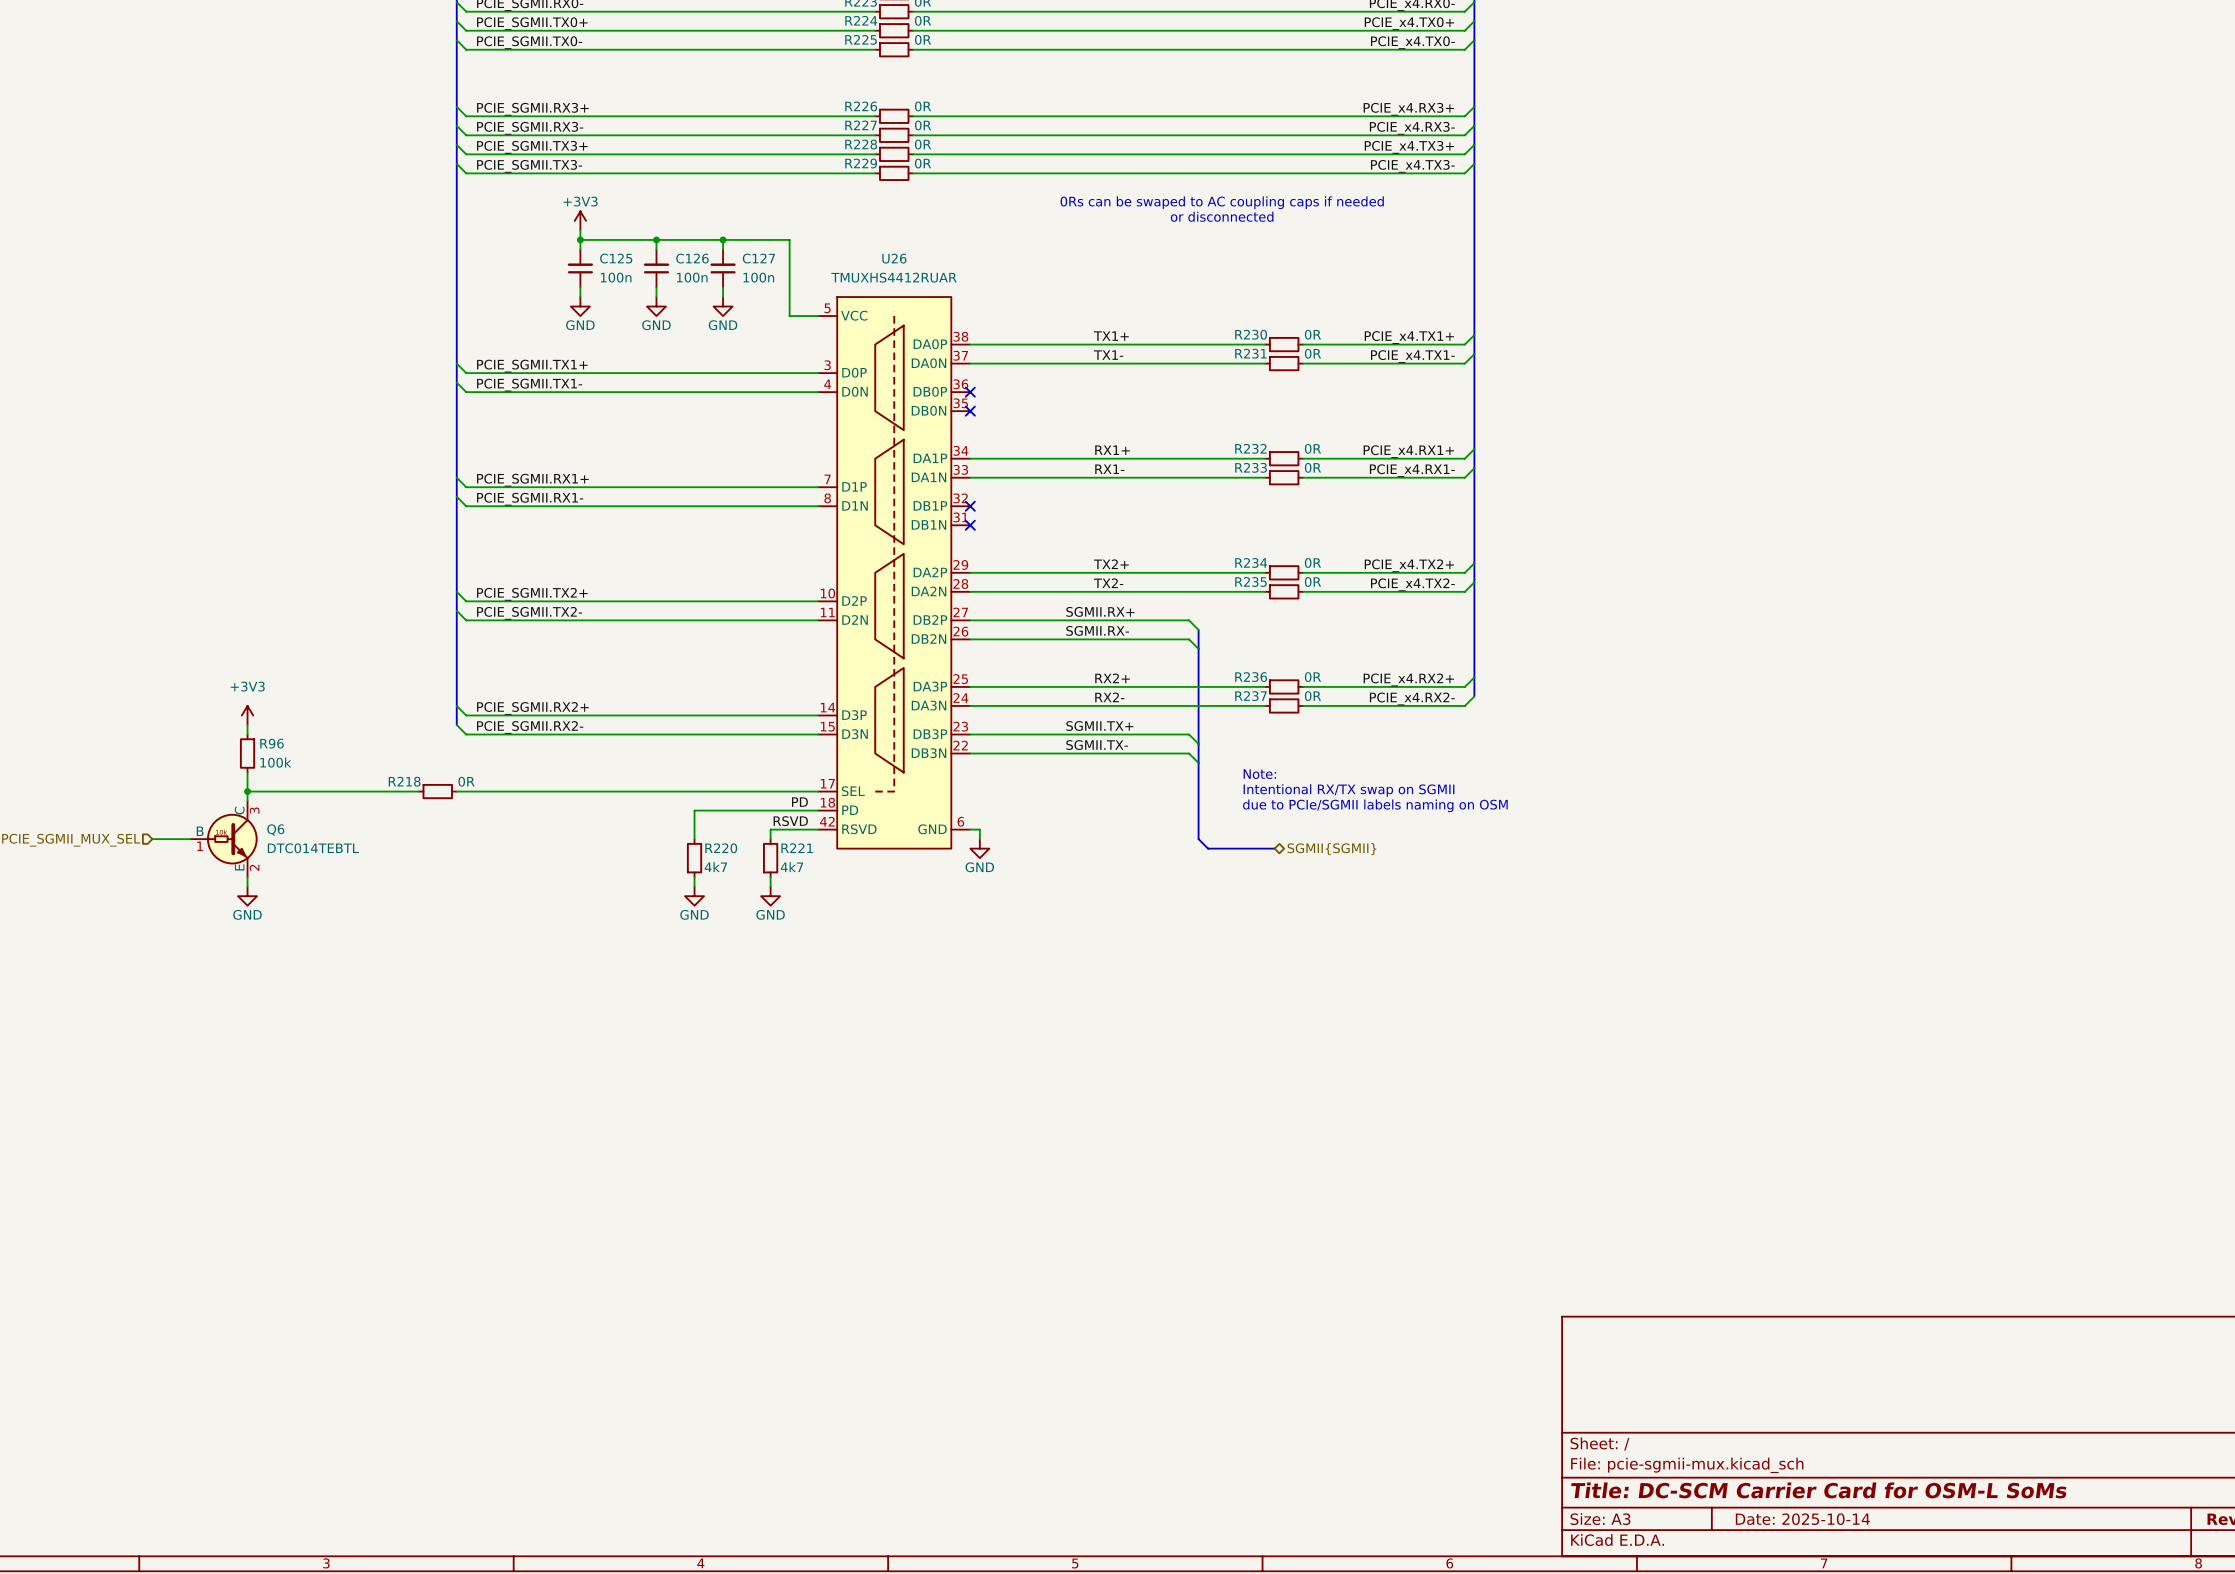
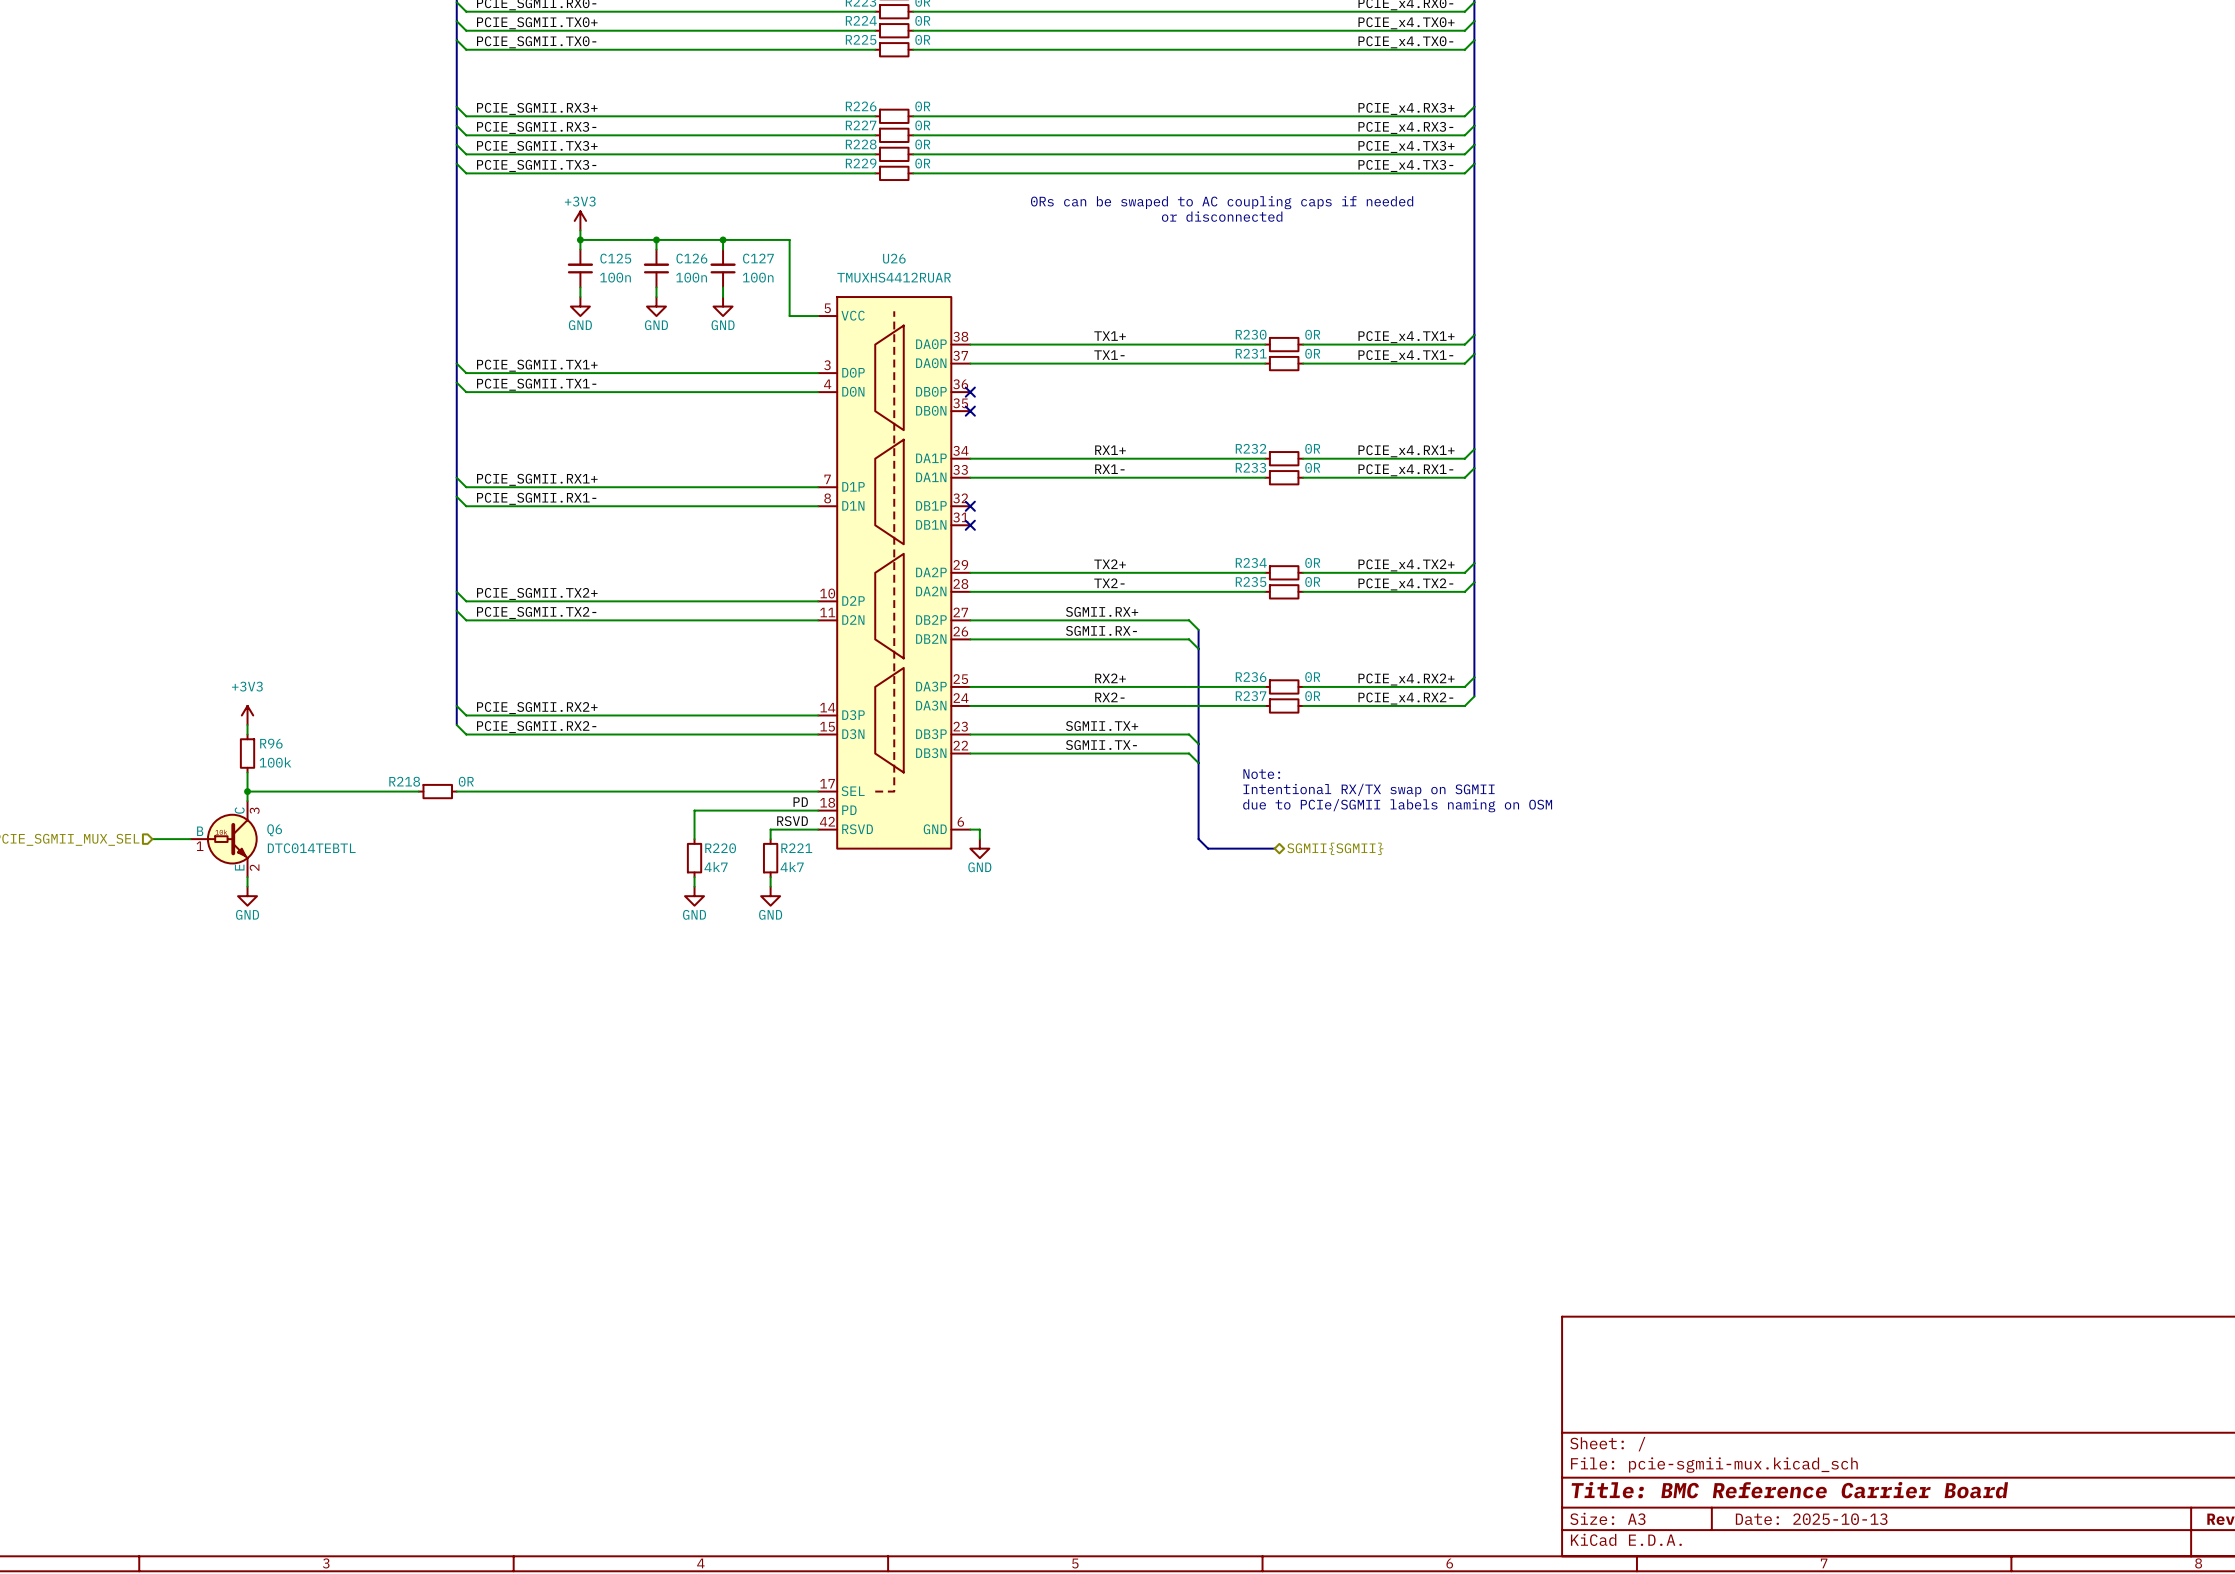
title block: Title: DC-SCM Carrier Card for OSM-L SoMs (1818, 1490) -> Title: BMC Reference Carrier Board (1789, 1490)
title block: Date: 2025-10-14 (1802, 1519) -> Date: 2025-10-13 (1811, 1519)

